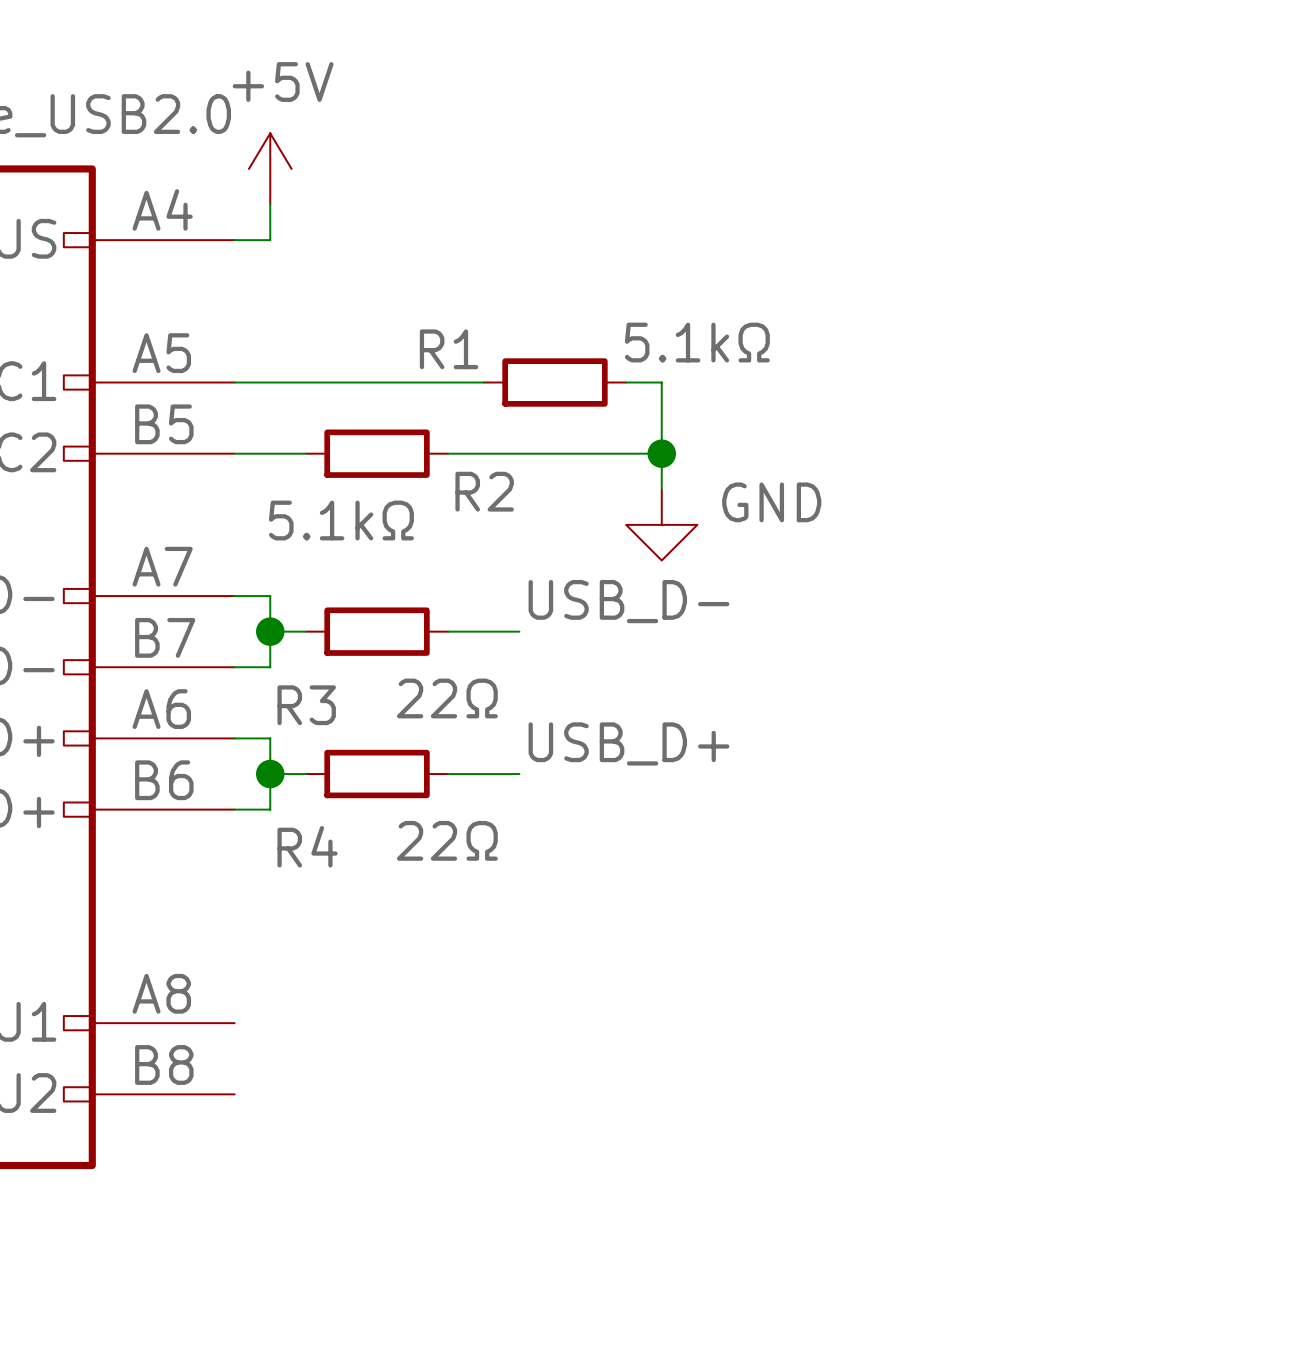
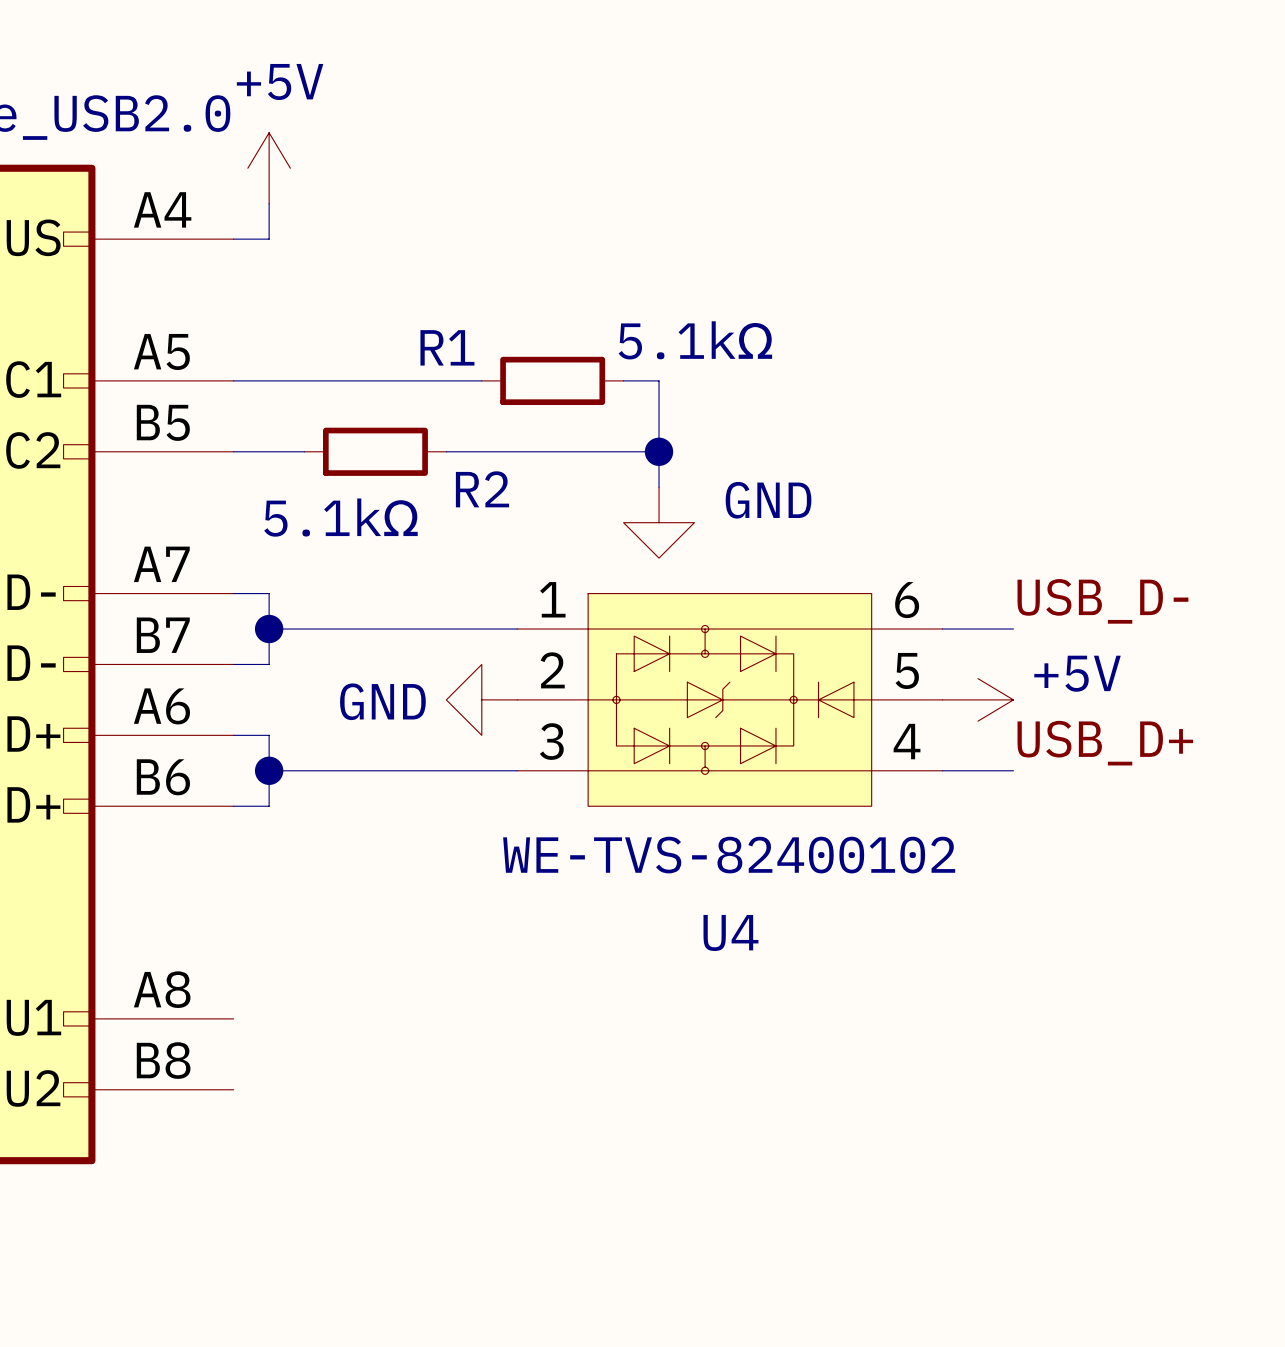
label position: USB_D- (628, 601) -> USB_D- (1102, 601)
wire: none -> (304, 629) (446, 629)
R3: 22Ω (377, 631) -> none
wire: none -> (942, 629) (1013, 629)
power symbol: none -> GND (481, 699)
U4: none -> WE-TVS-82400102 (729, 699)
power symbol: none -> +5V (978, 699)
label position: USB_D+ (628, 743) -> USB_D+ (1105, 743)
wire: none -> (304, 770) (446, 770)
R4: 22Ω (377, 774) -> none
wire: none -> (942, 770) (1013, 770)

